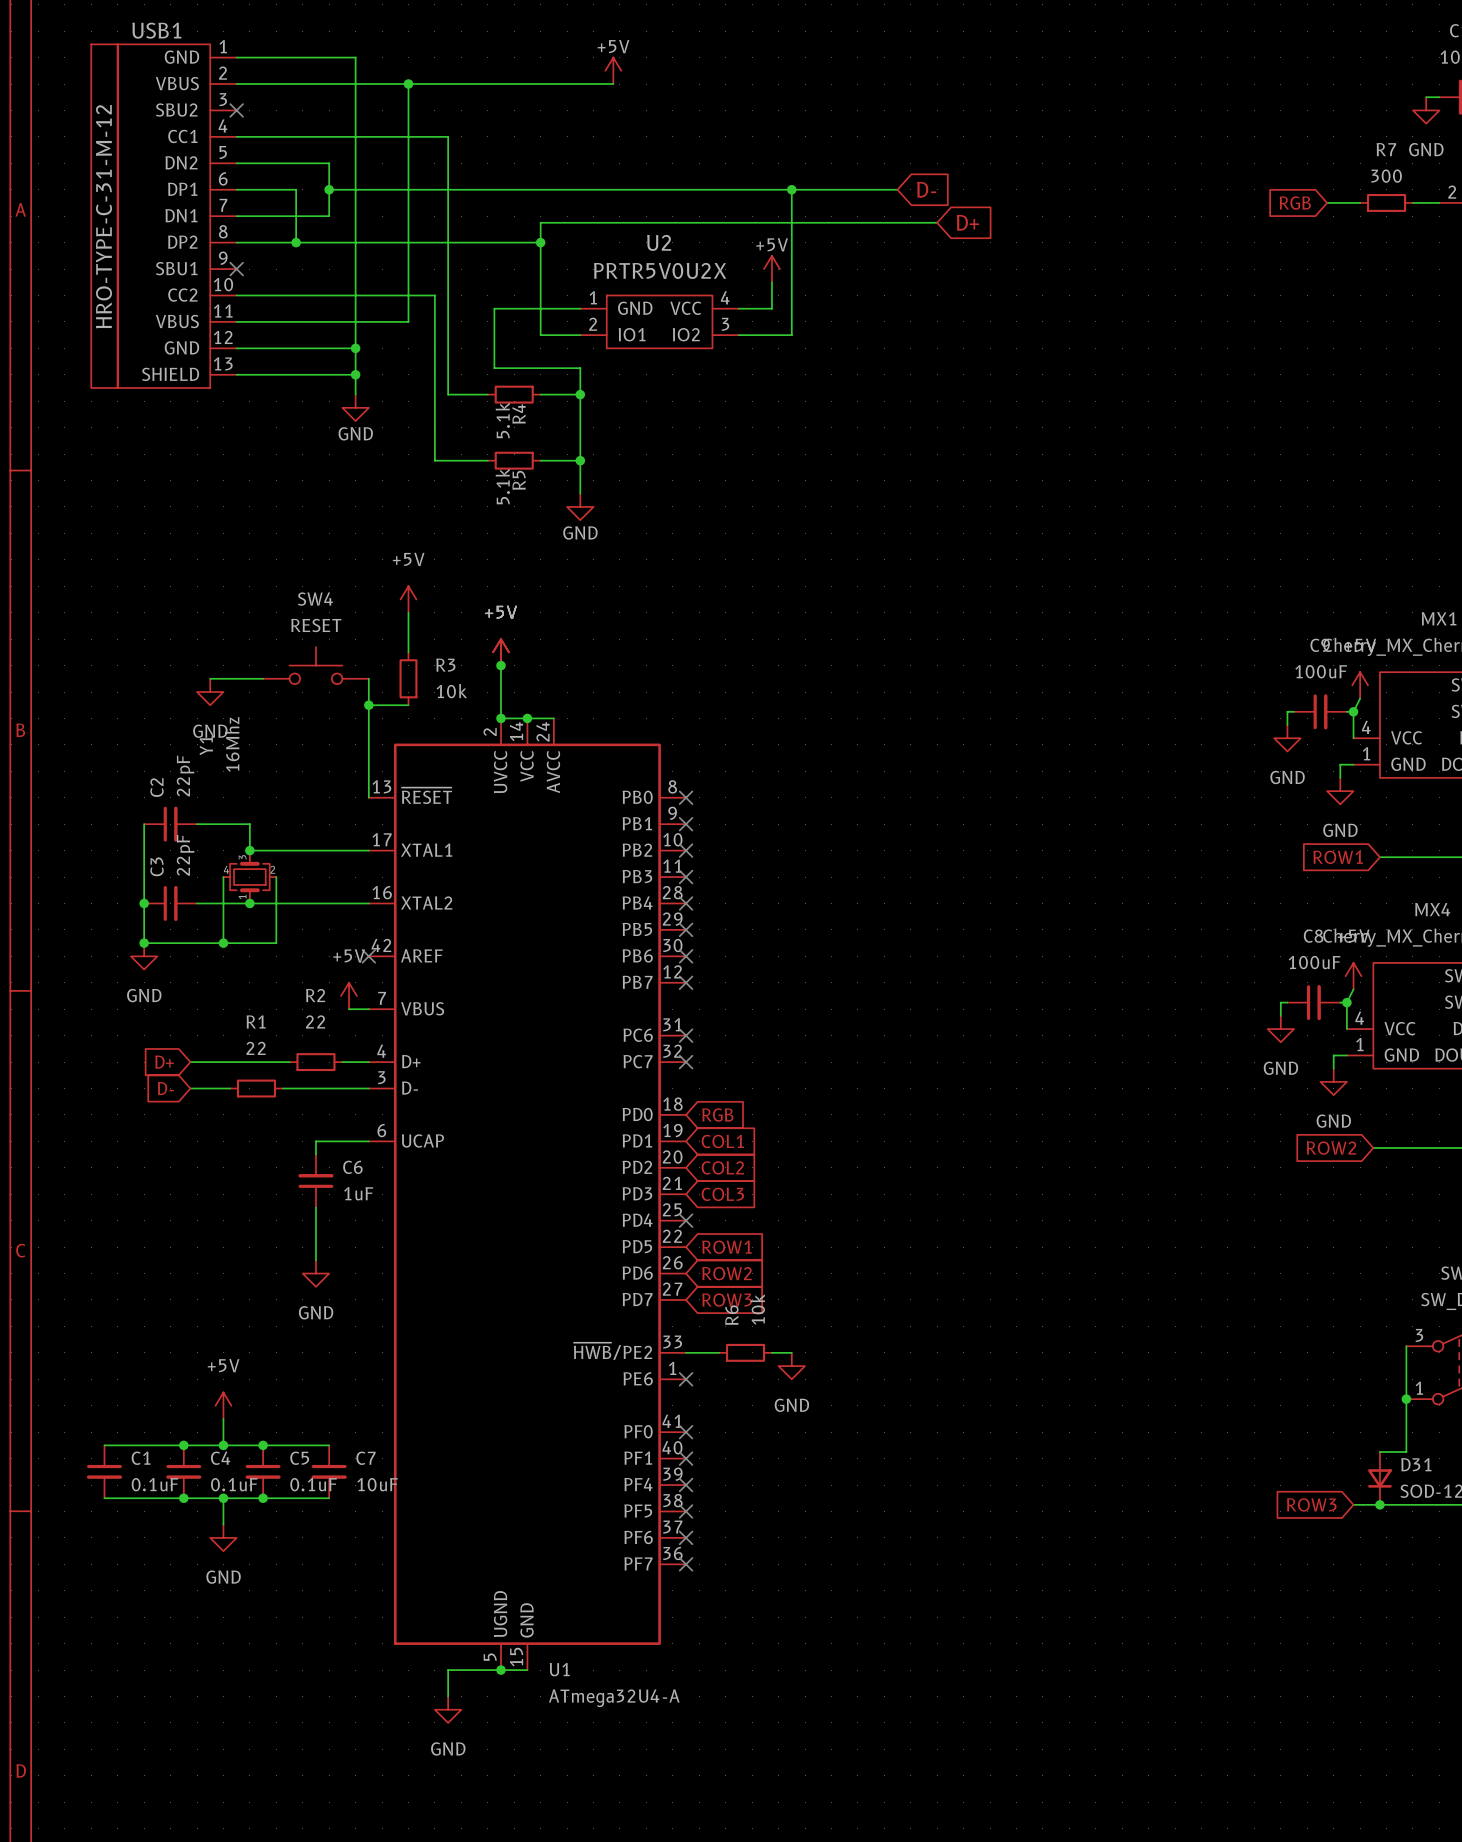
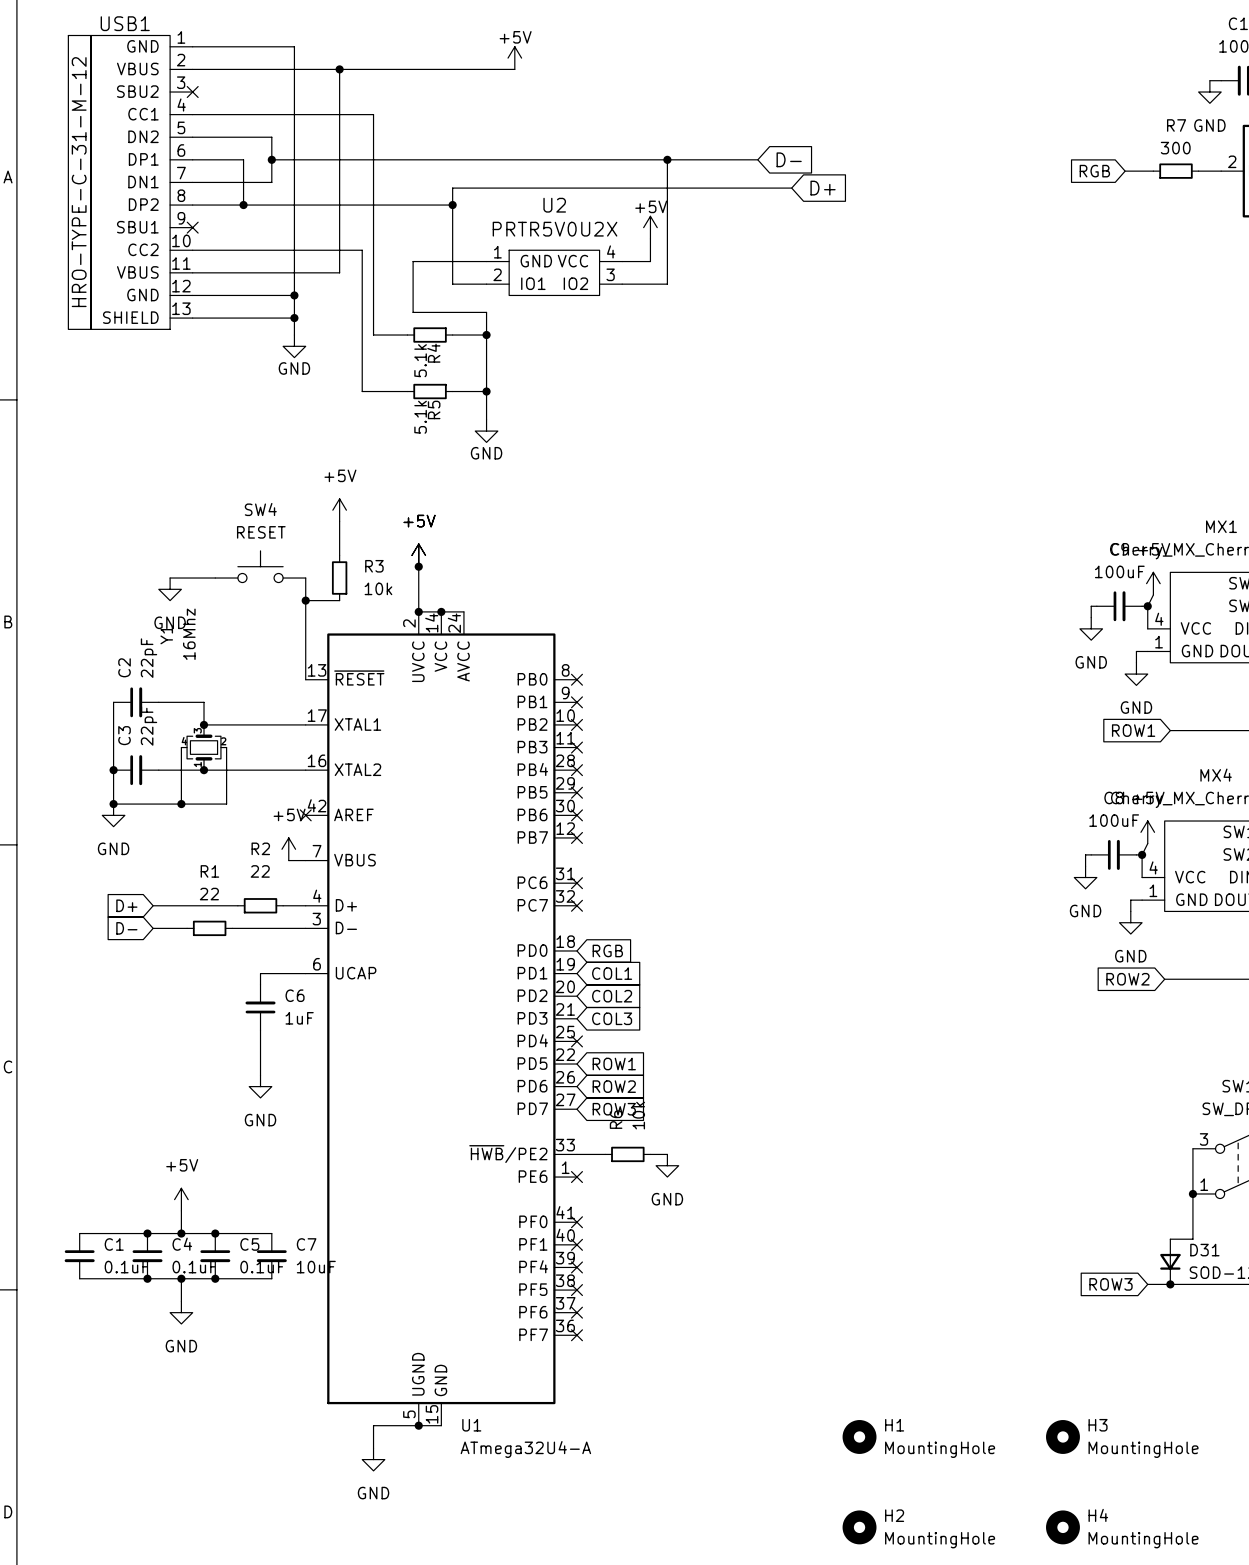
H1: none -> MountingHole (859, 1436)
H3: none -> MountingHole (1062, 1436)
H2: none -> MountingHole (859, 1527)
H4: none -> MountingHole (1062, 1527)

